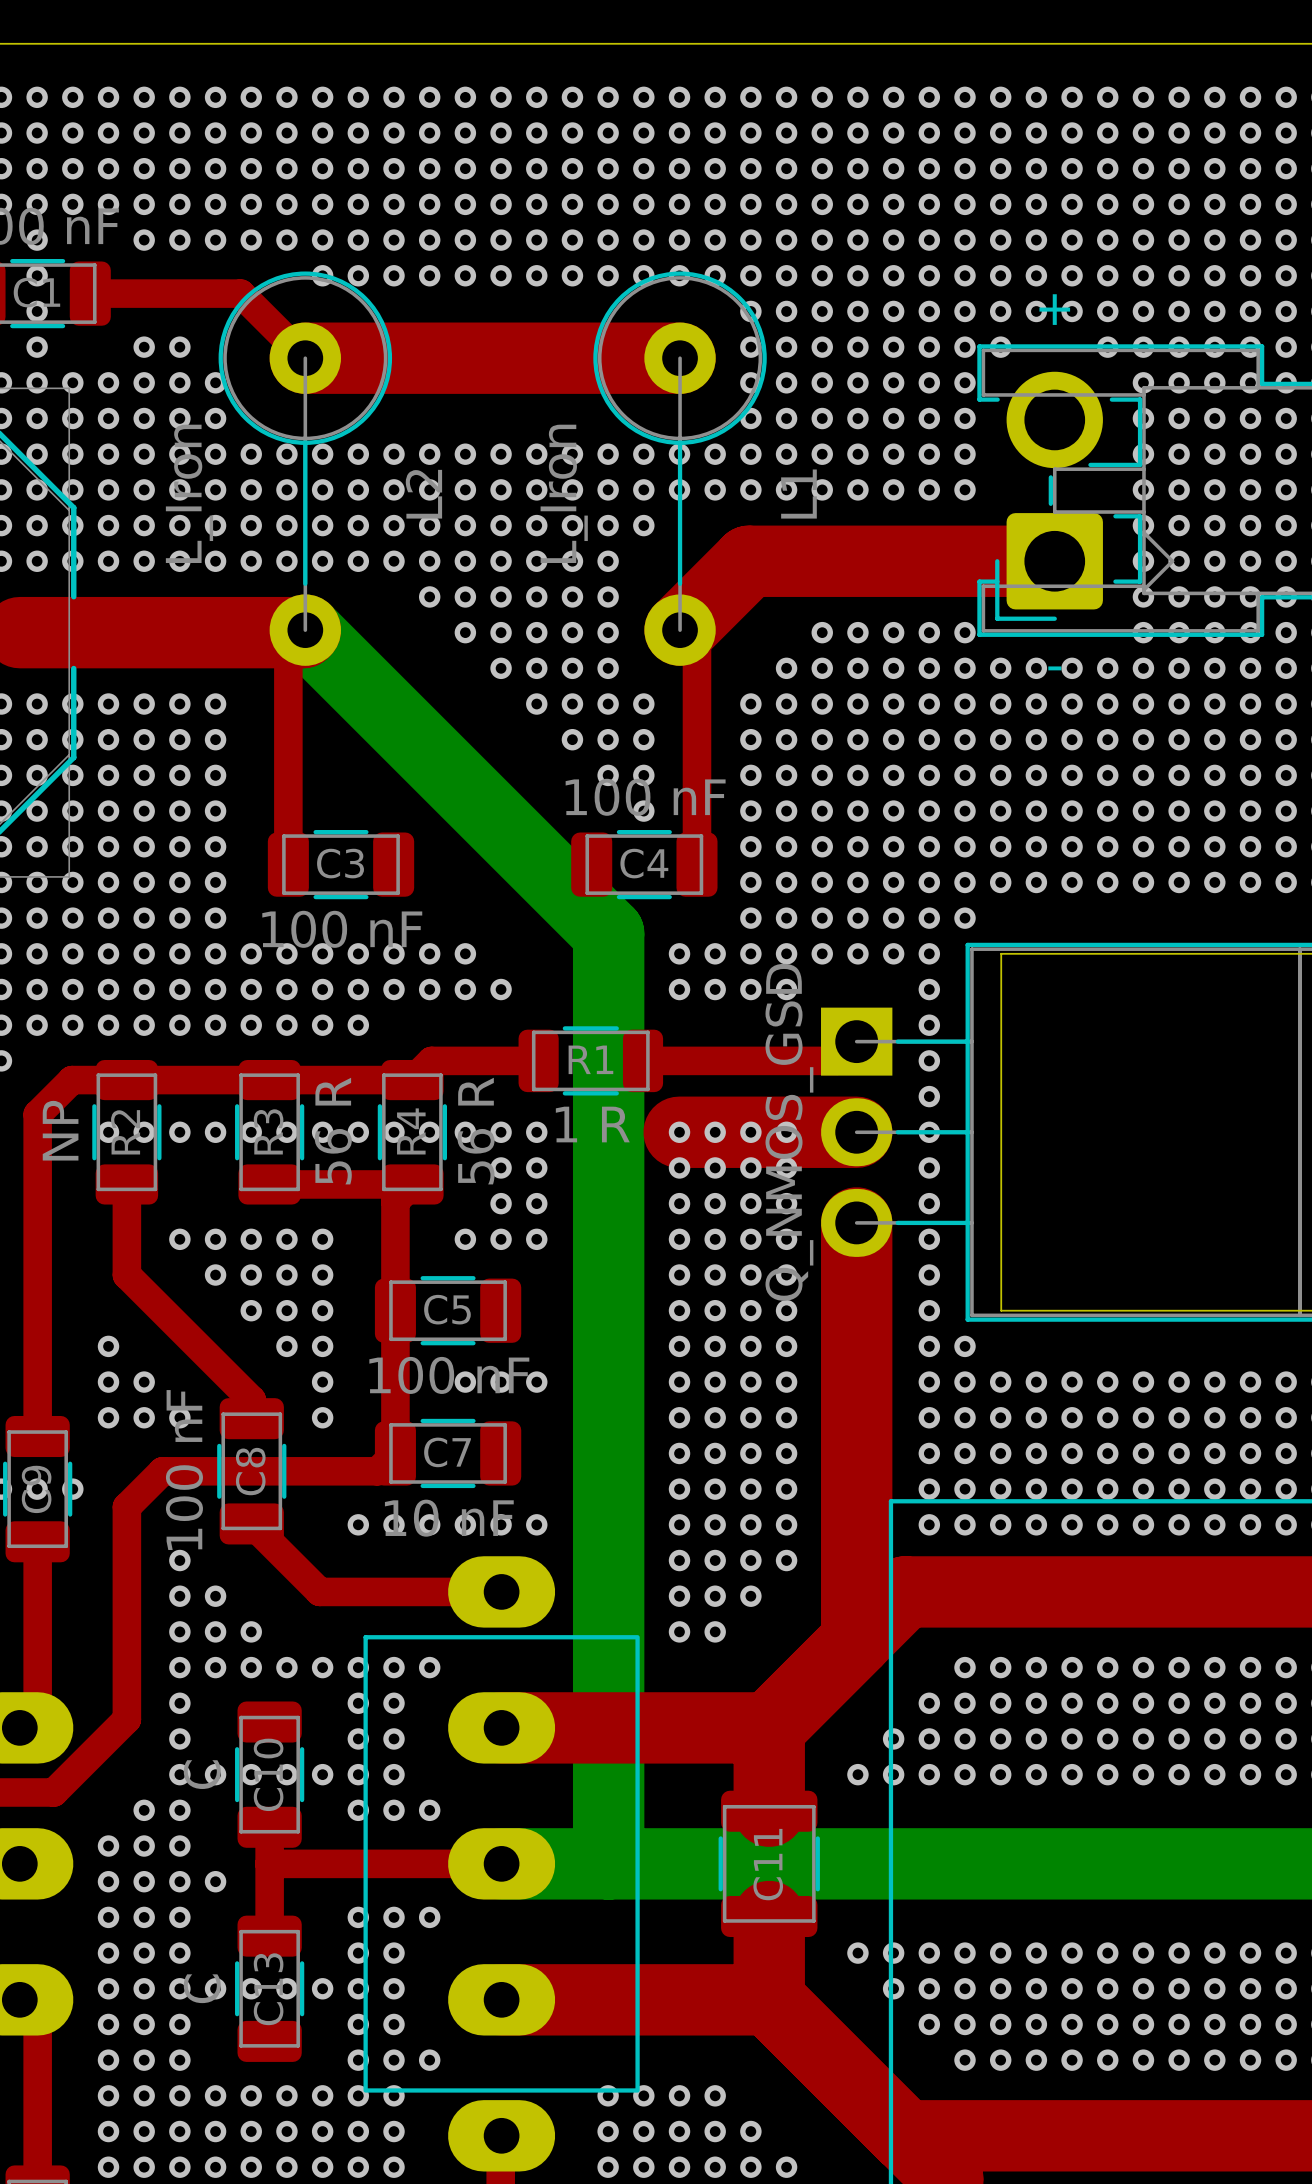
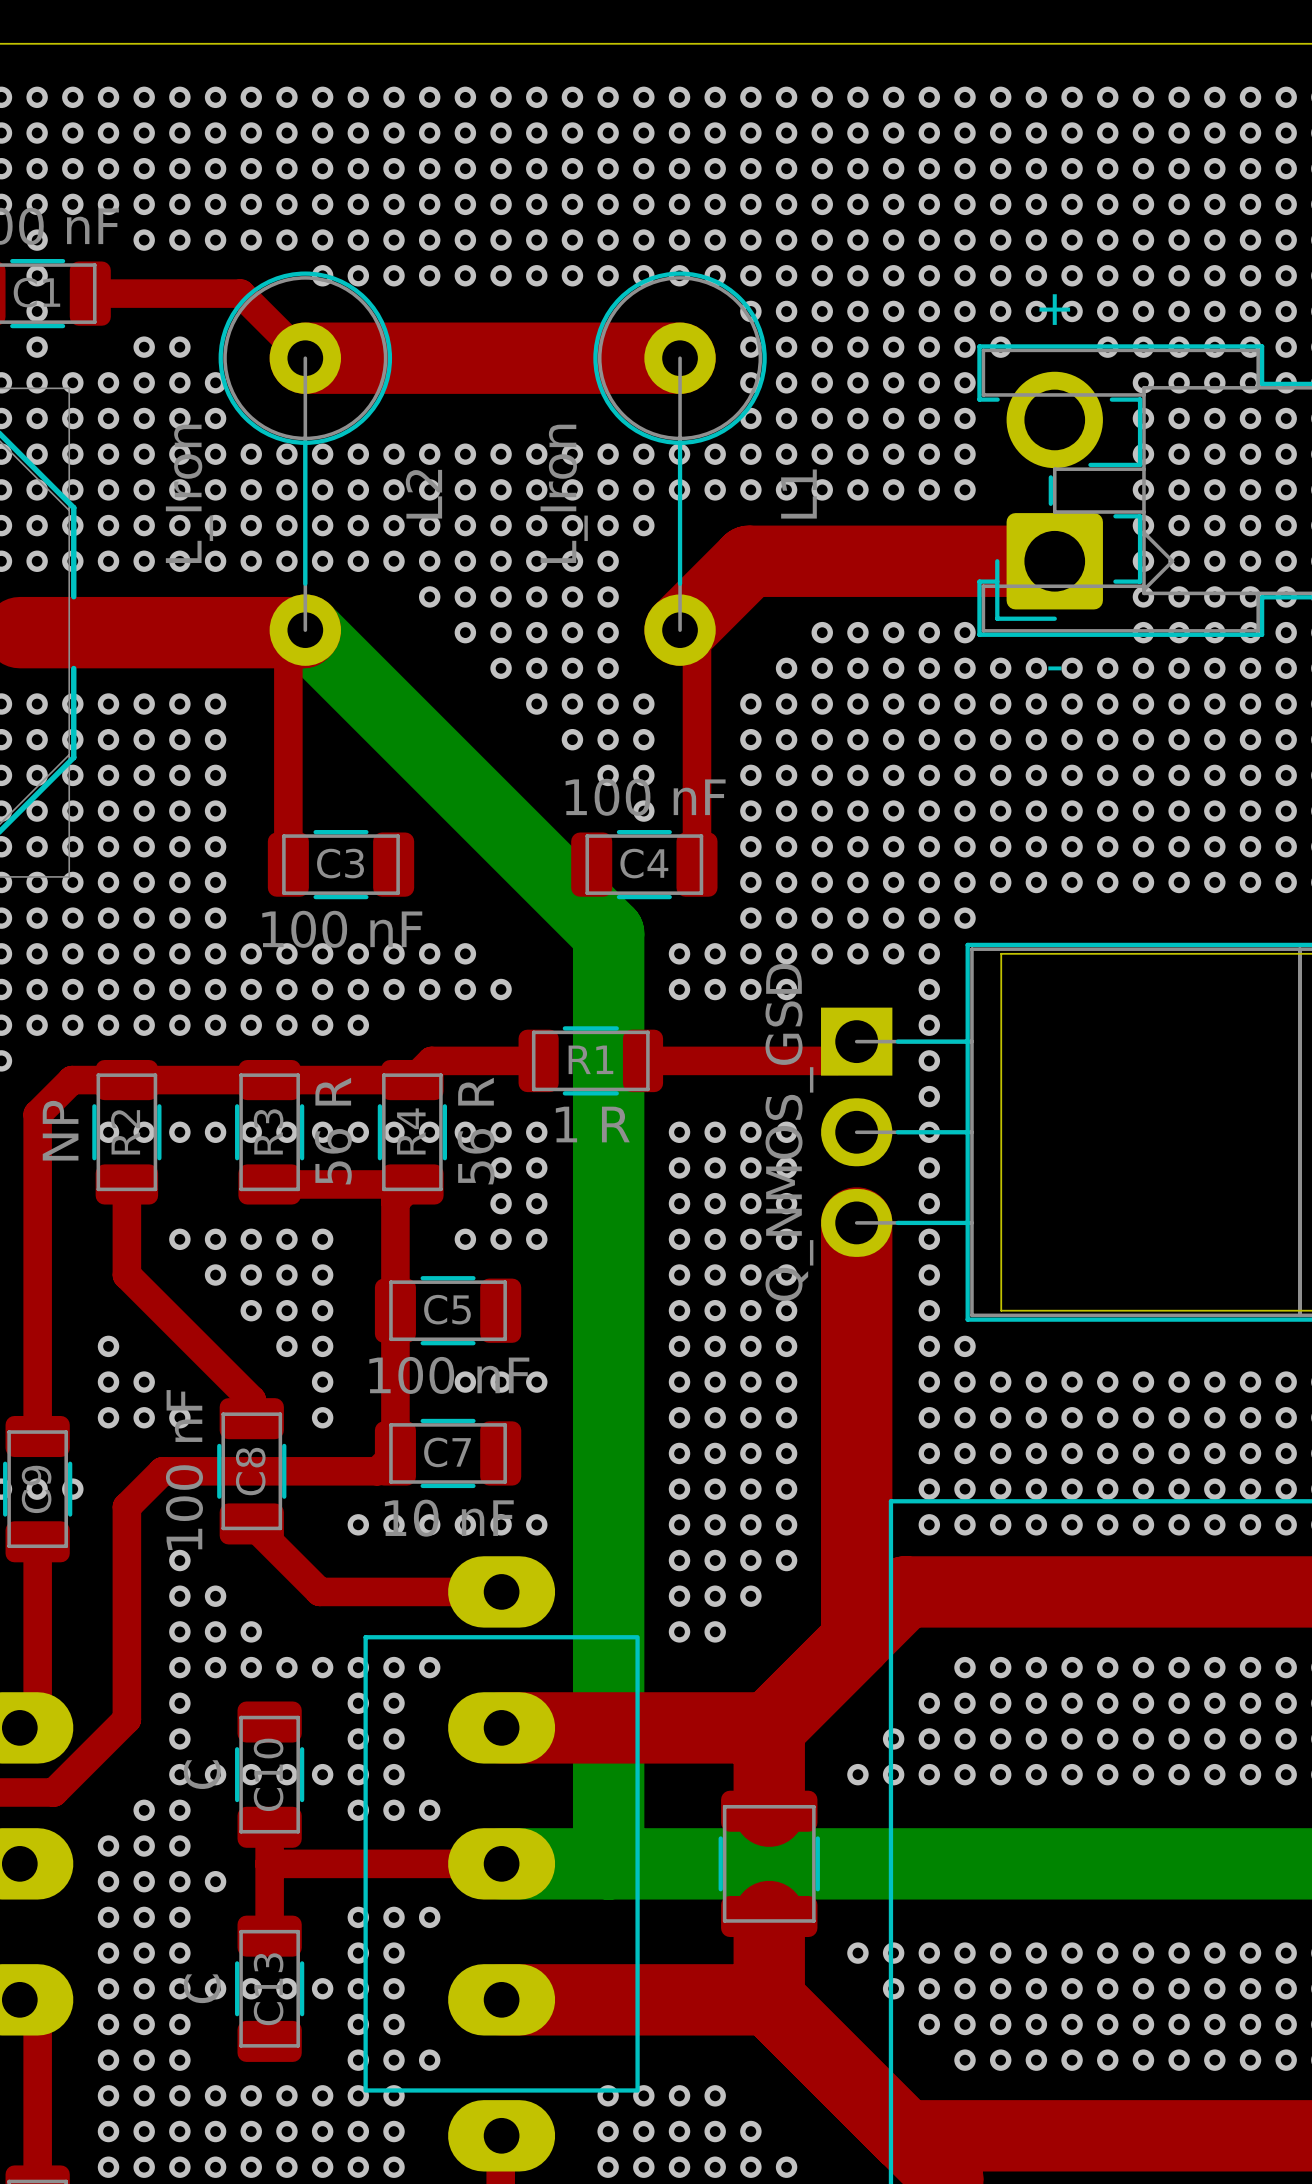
top track: (679, 1132) (856, 1132) -> none
C11 name: C11 (768, 1864) -> none

